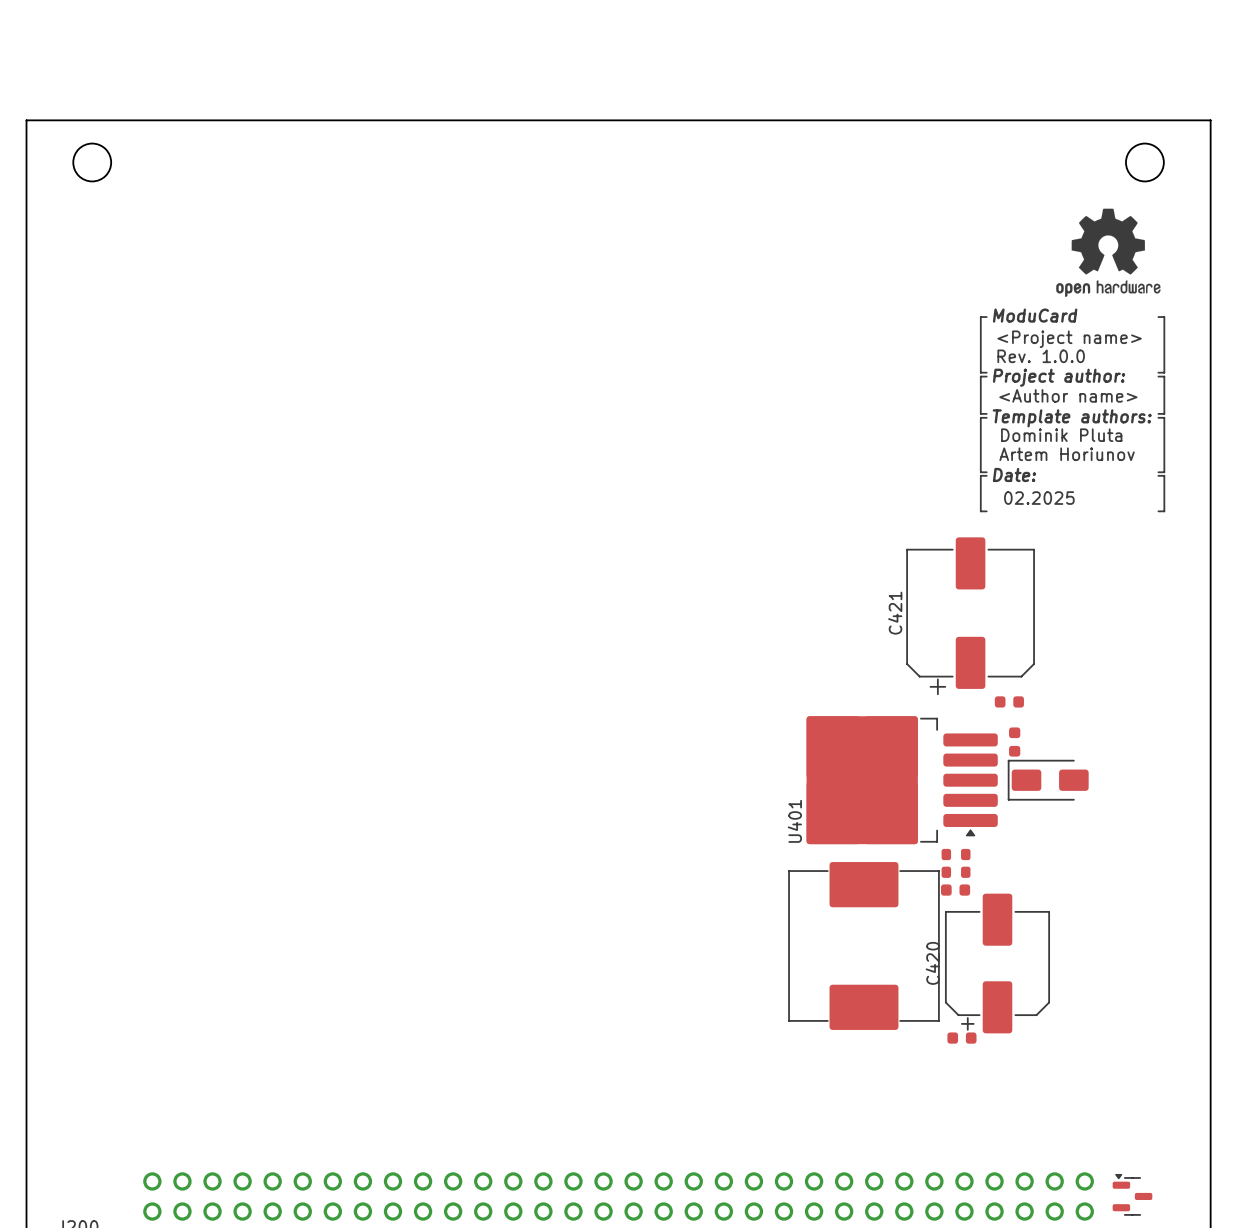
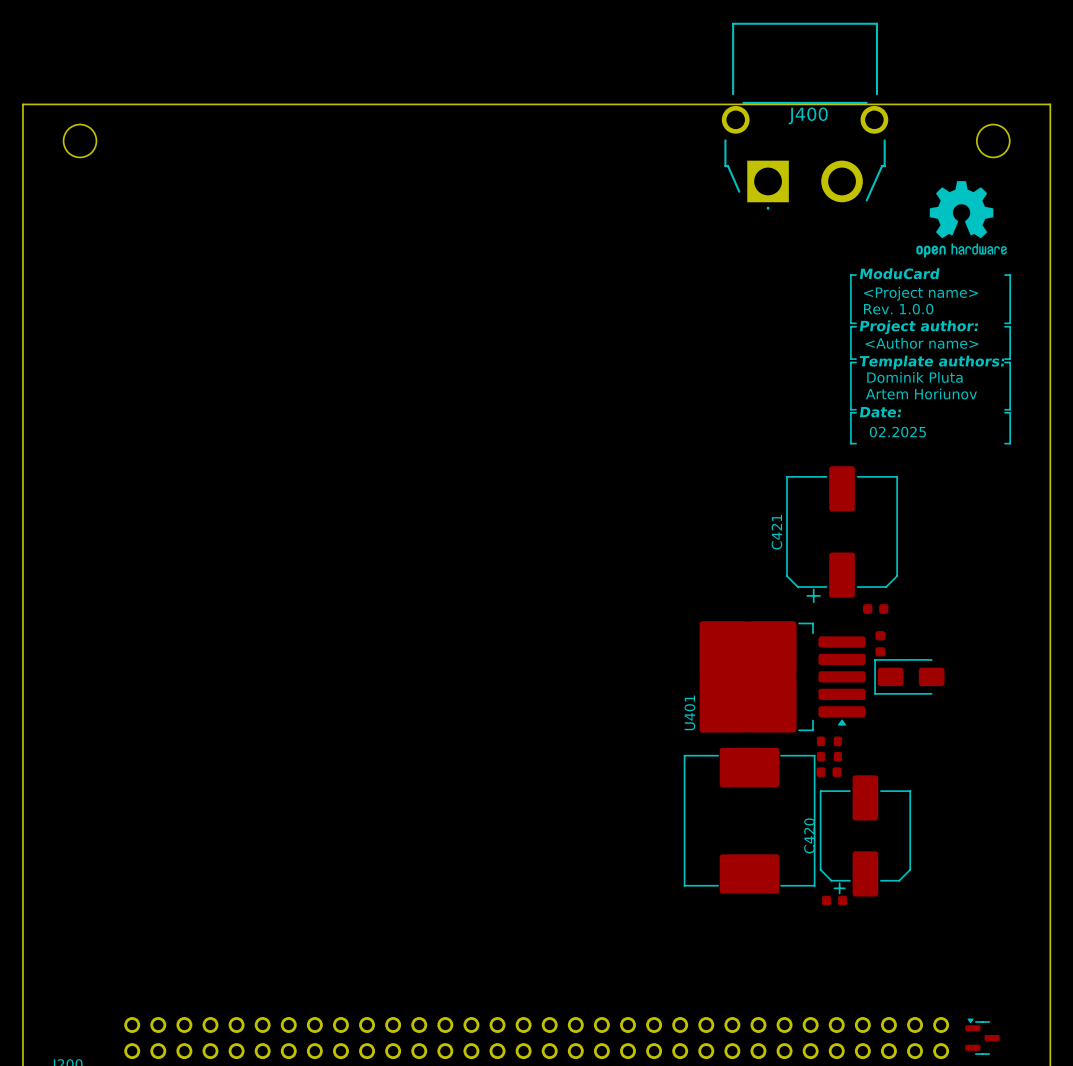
J400: none -> (805, 115)

